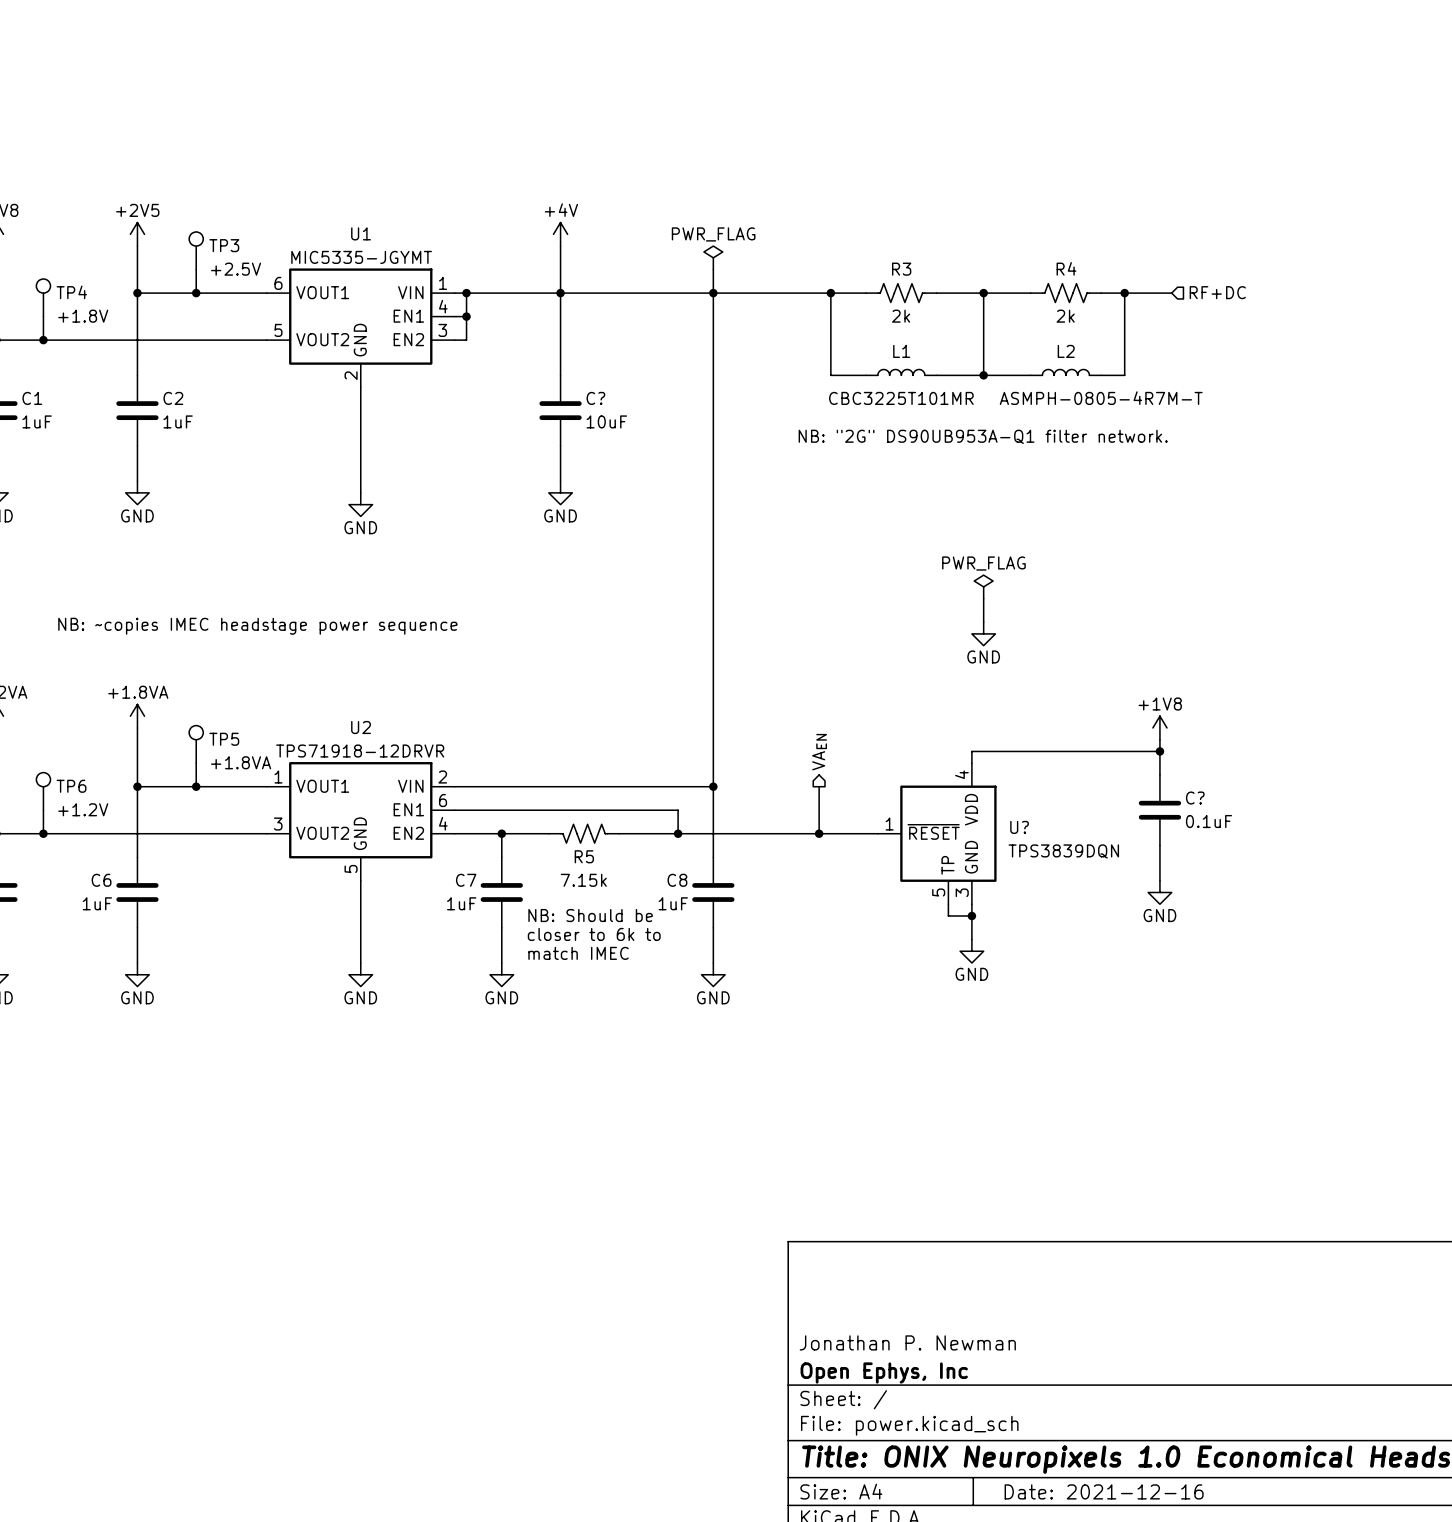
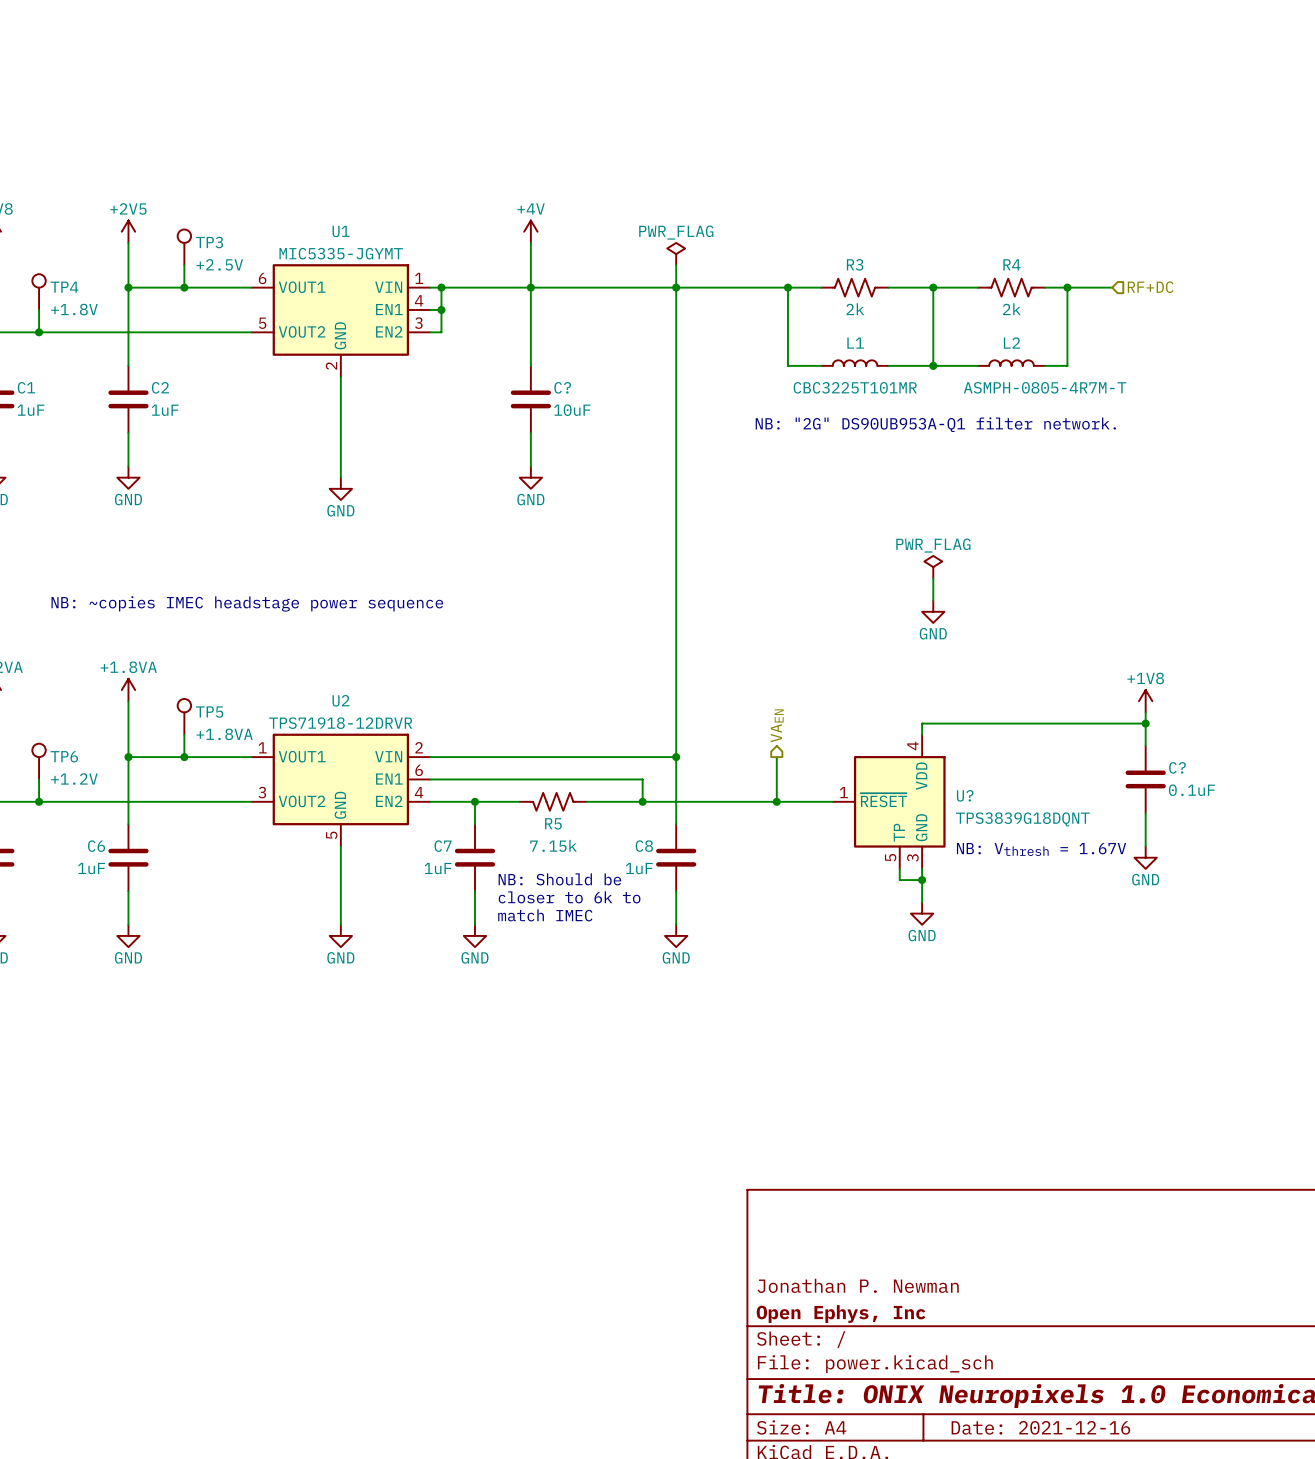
power symbol position: +1V8 (1159, 727) -> +1V8 (1145, 701)
wire: (1159, 739) (1159, 774) -> (1145, 712) (1145, 745)
wire: none -> (1100, 723) (1145, 723)
junction position: (1159, 751) -> (1145, 723)
C? position: (1159, 810) -> (1145, 779)
wire: (1159, 845) (1159, 880) -> (1145, 812) (1145, 846)
U? value: TPS3839DQN (1063, 851) -> TPS3839G18DQNT (1022, 819)
text: none -> NB: Vthresh = 1.67V (1041, 849)
power symbol position: GND (1159, 892) -> GND (1145, 857)

